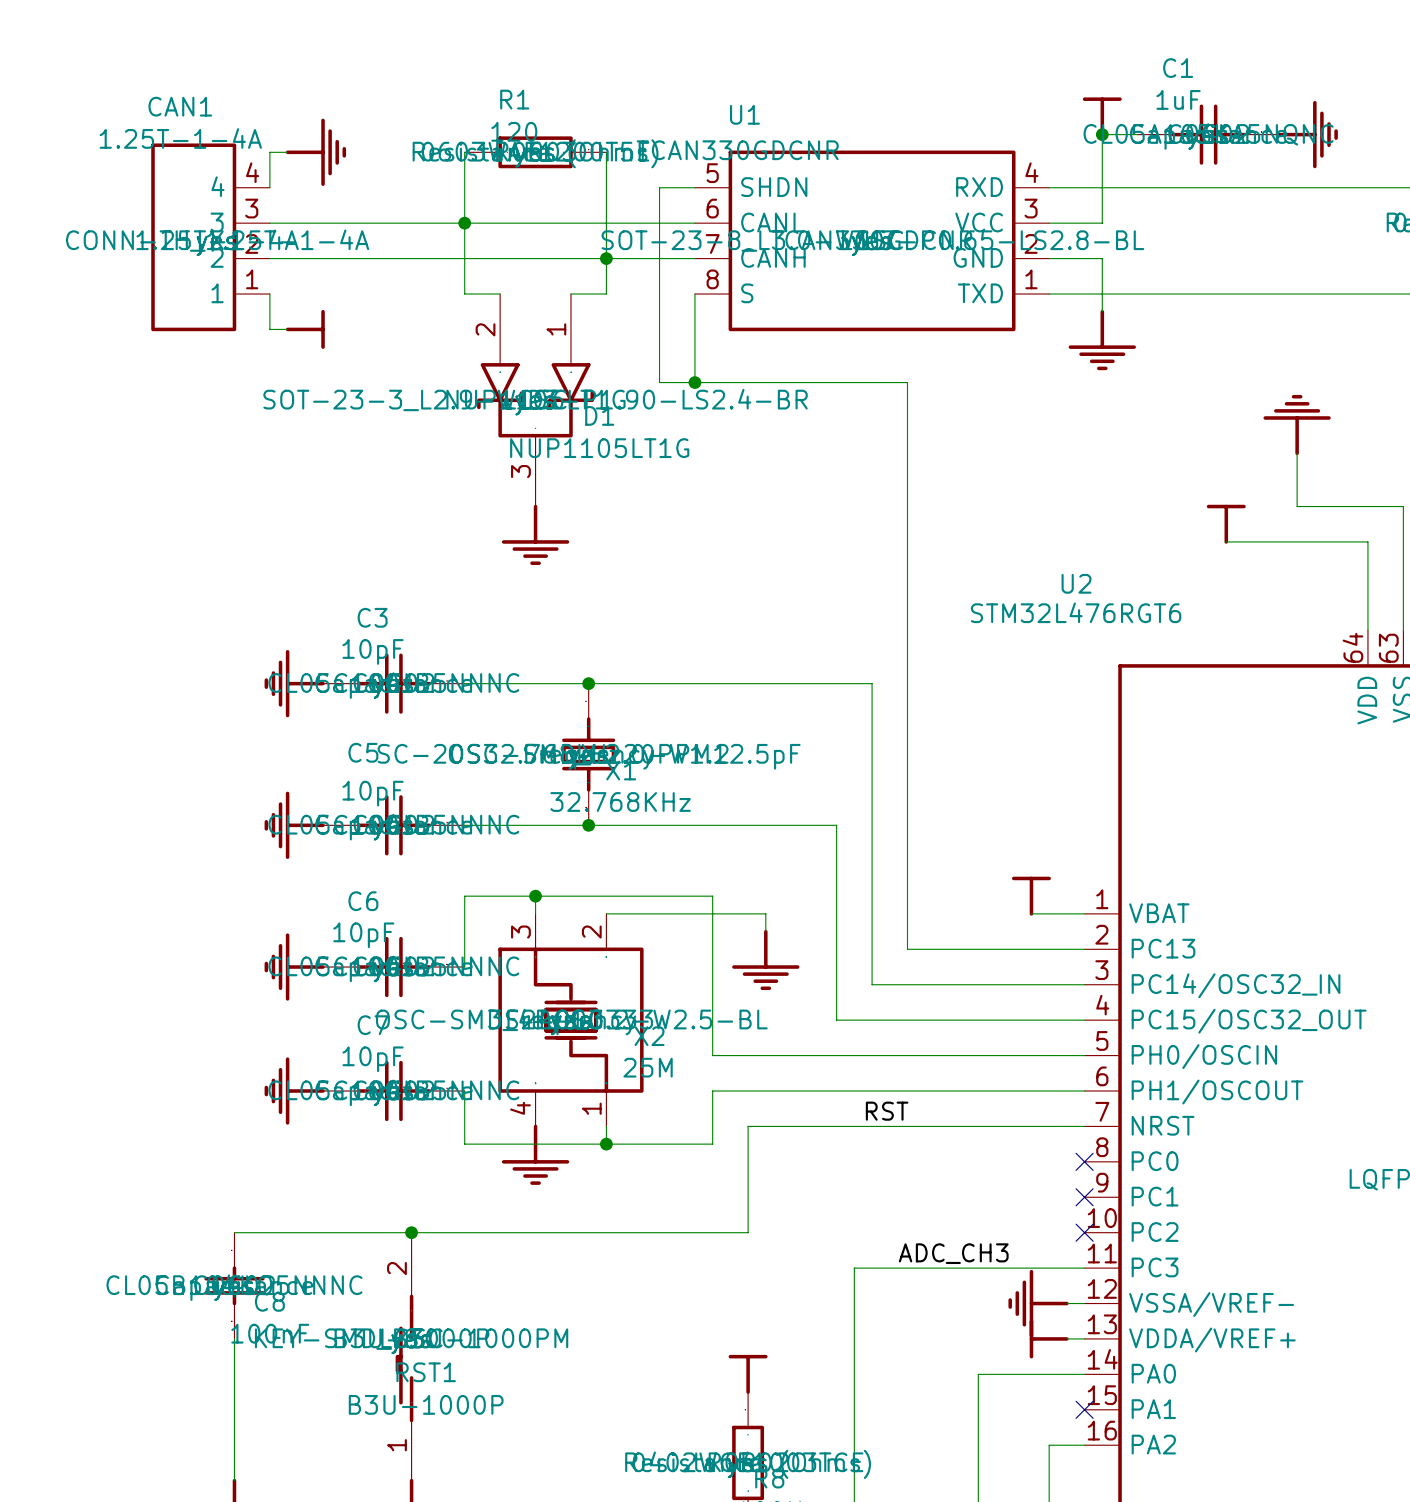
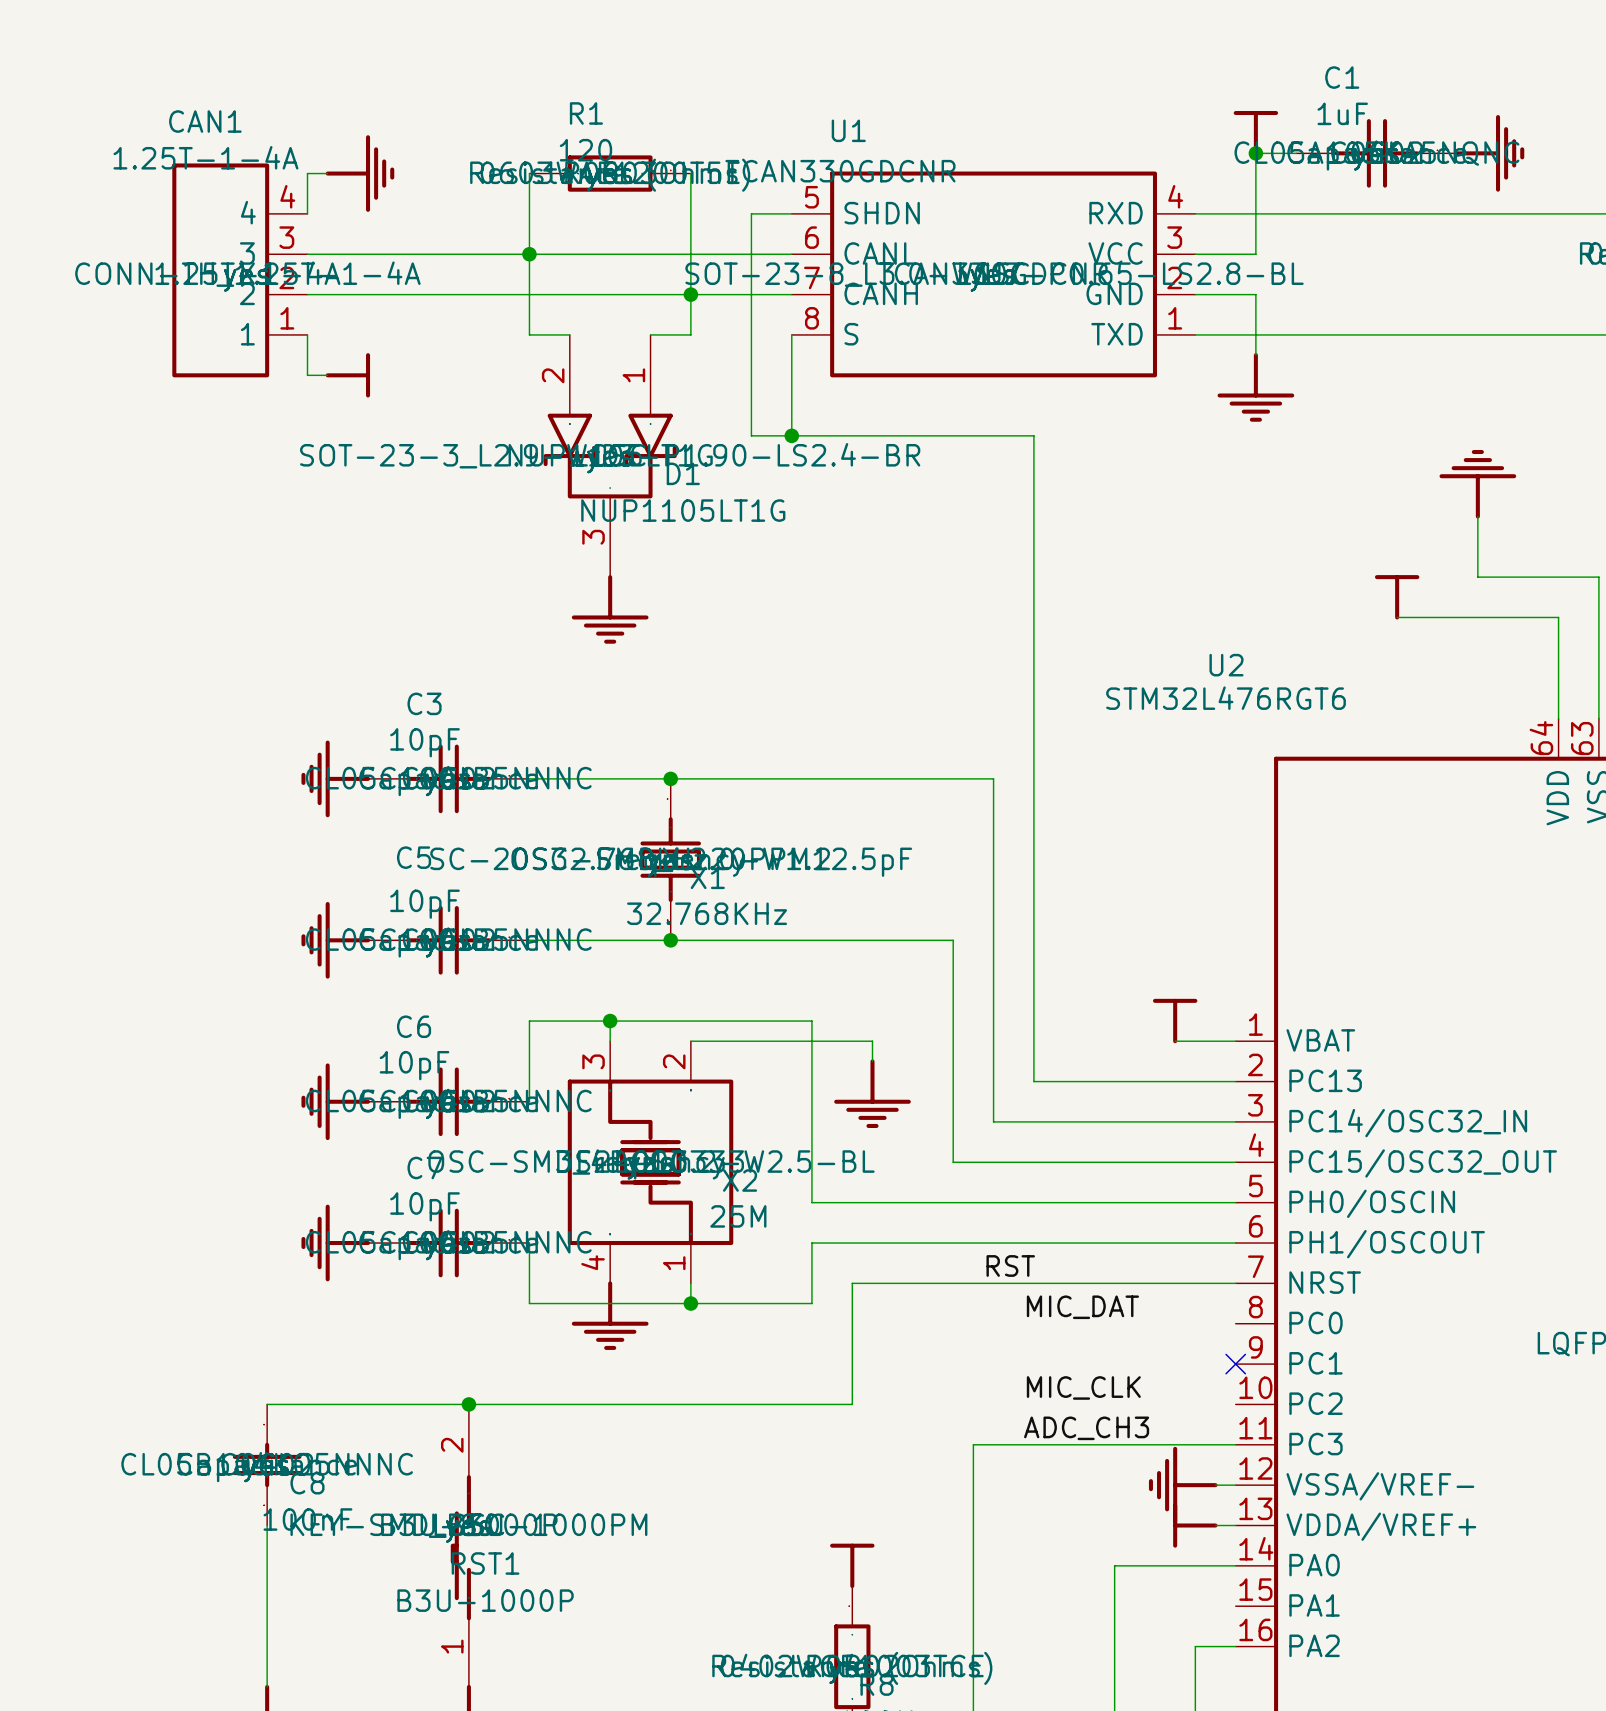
label: none -> MIC_DAT (1082, 1307)
no-connect mark: (1084, 1161) -> none
label: none -> MIC_CLK (1083, 1387)
no-connect mark: (1084, 1232) -> none
no-connect mark: (1084, 1409) -> none

